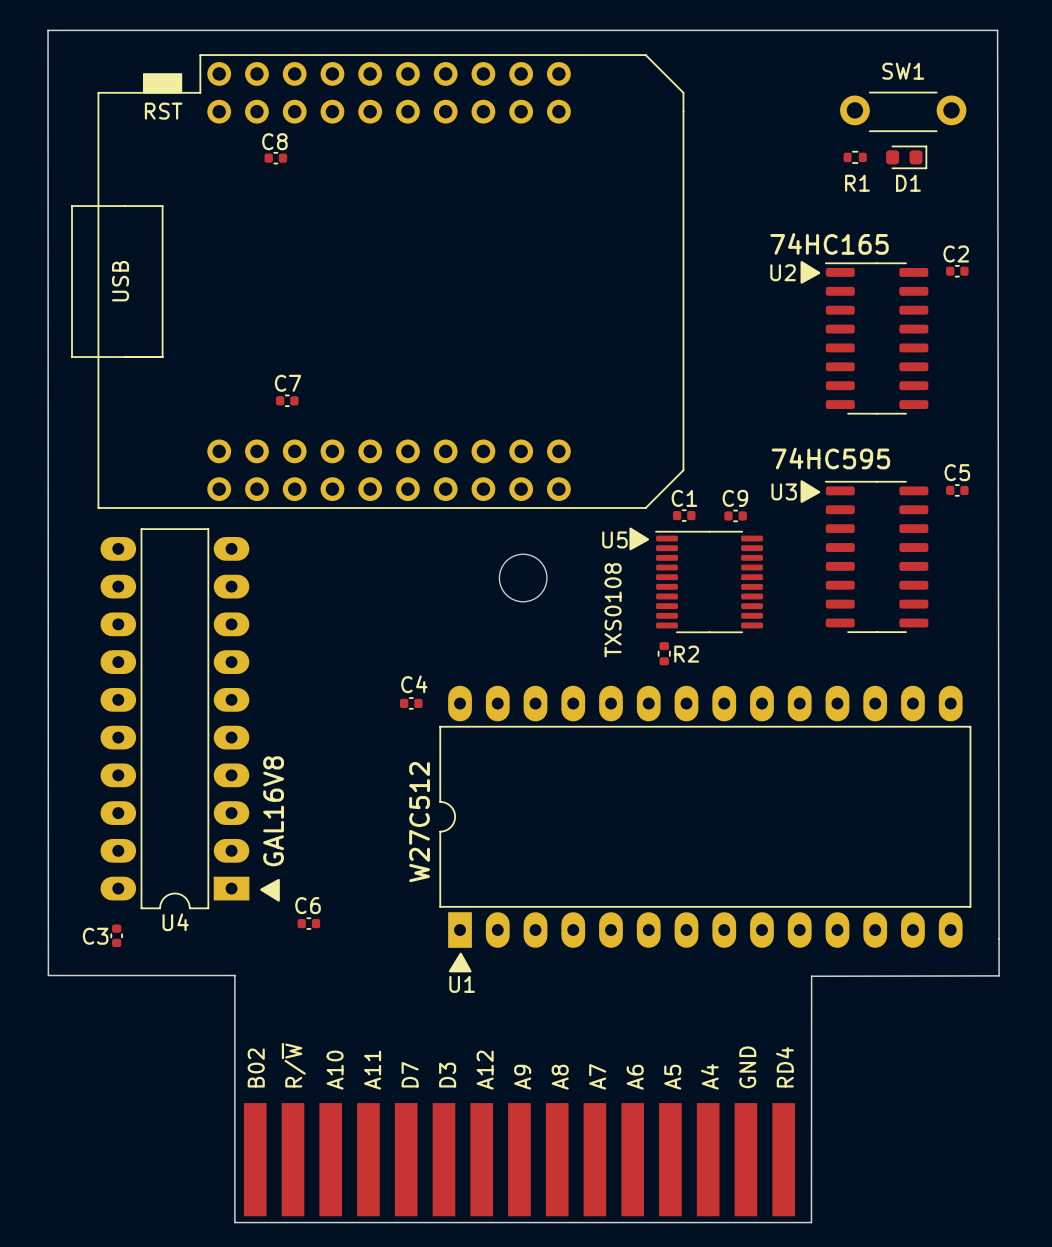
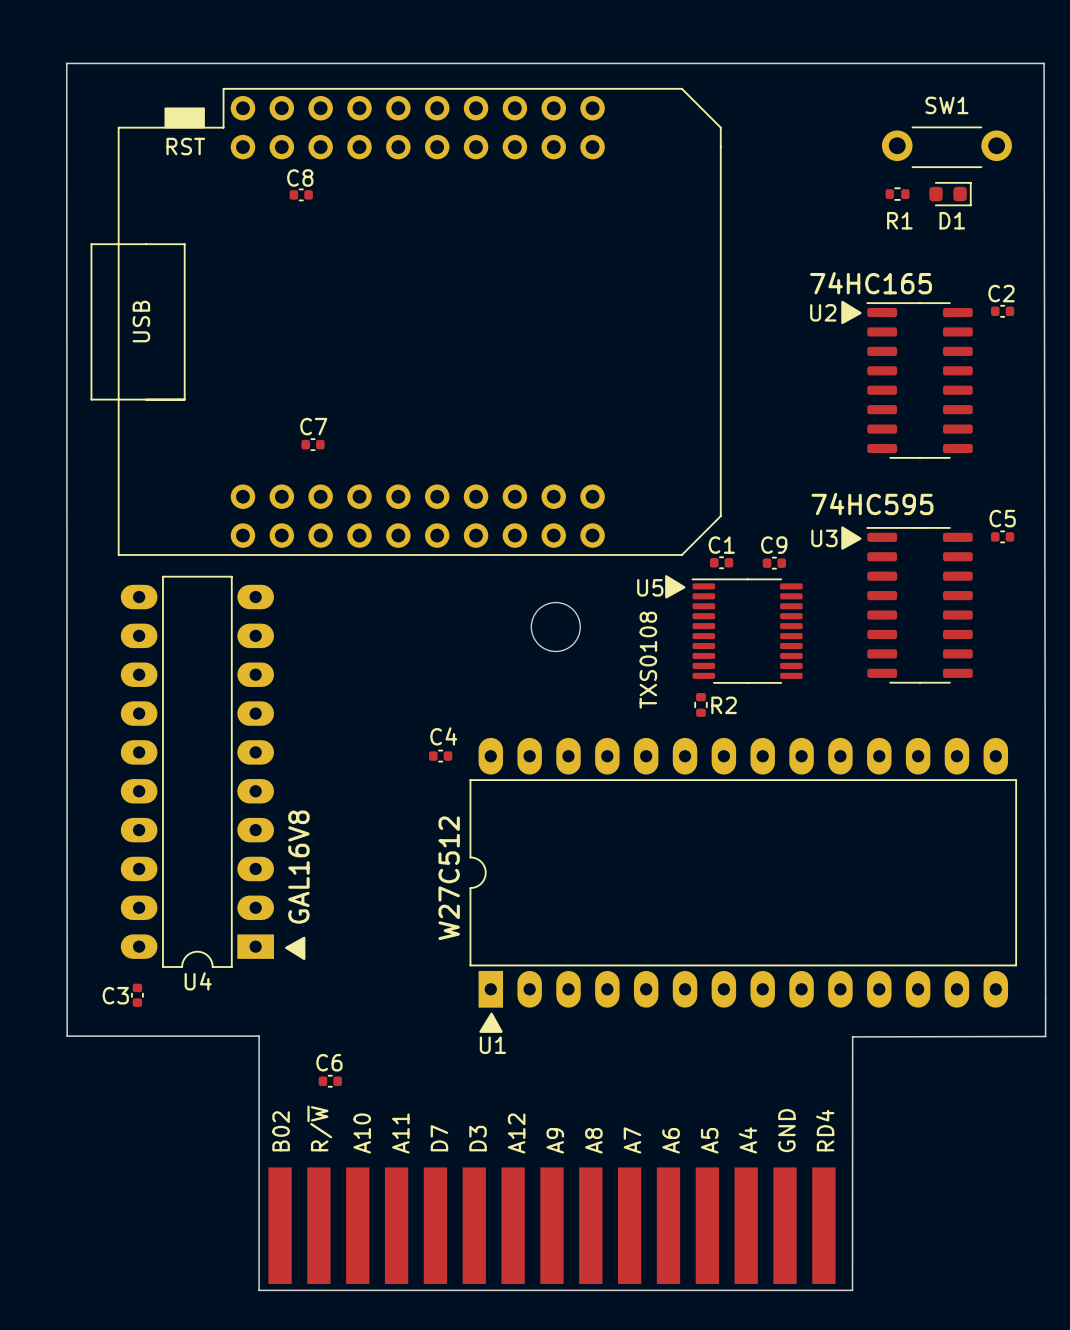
C6 position: (308, 923) -> (330, 1081)

